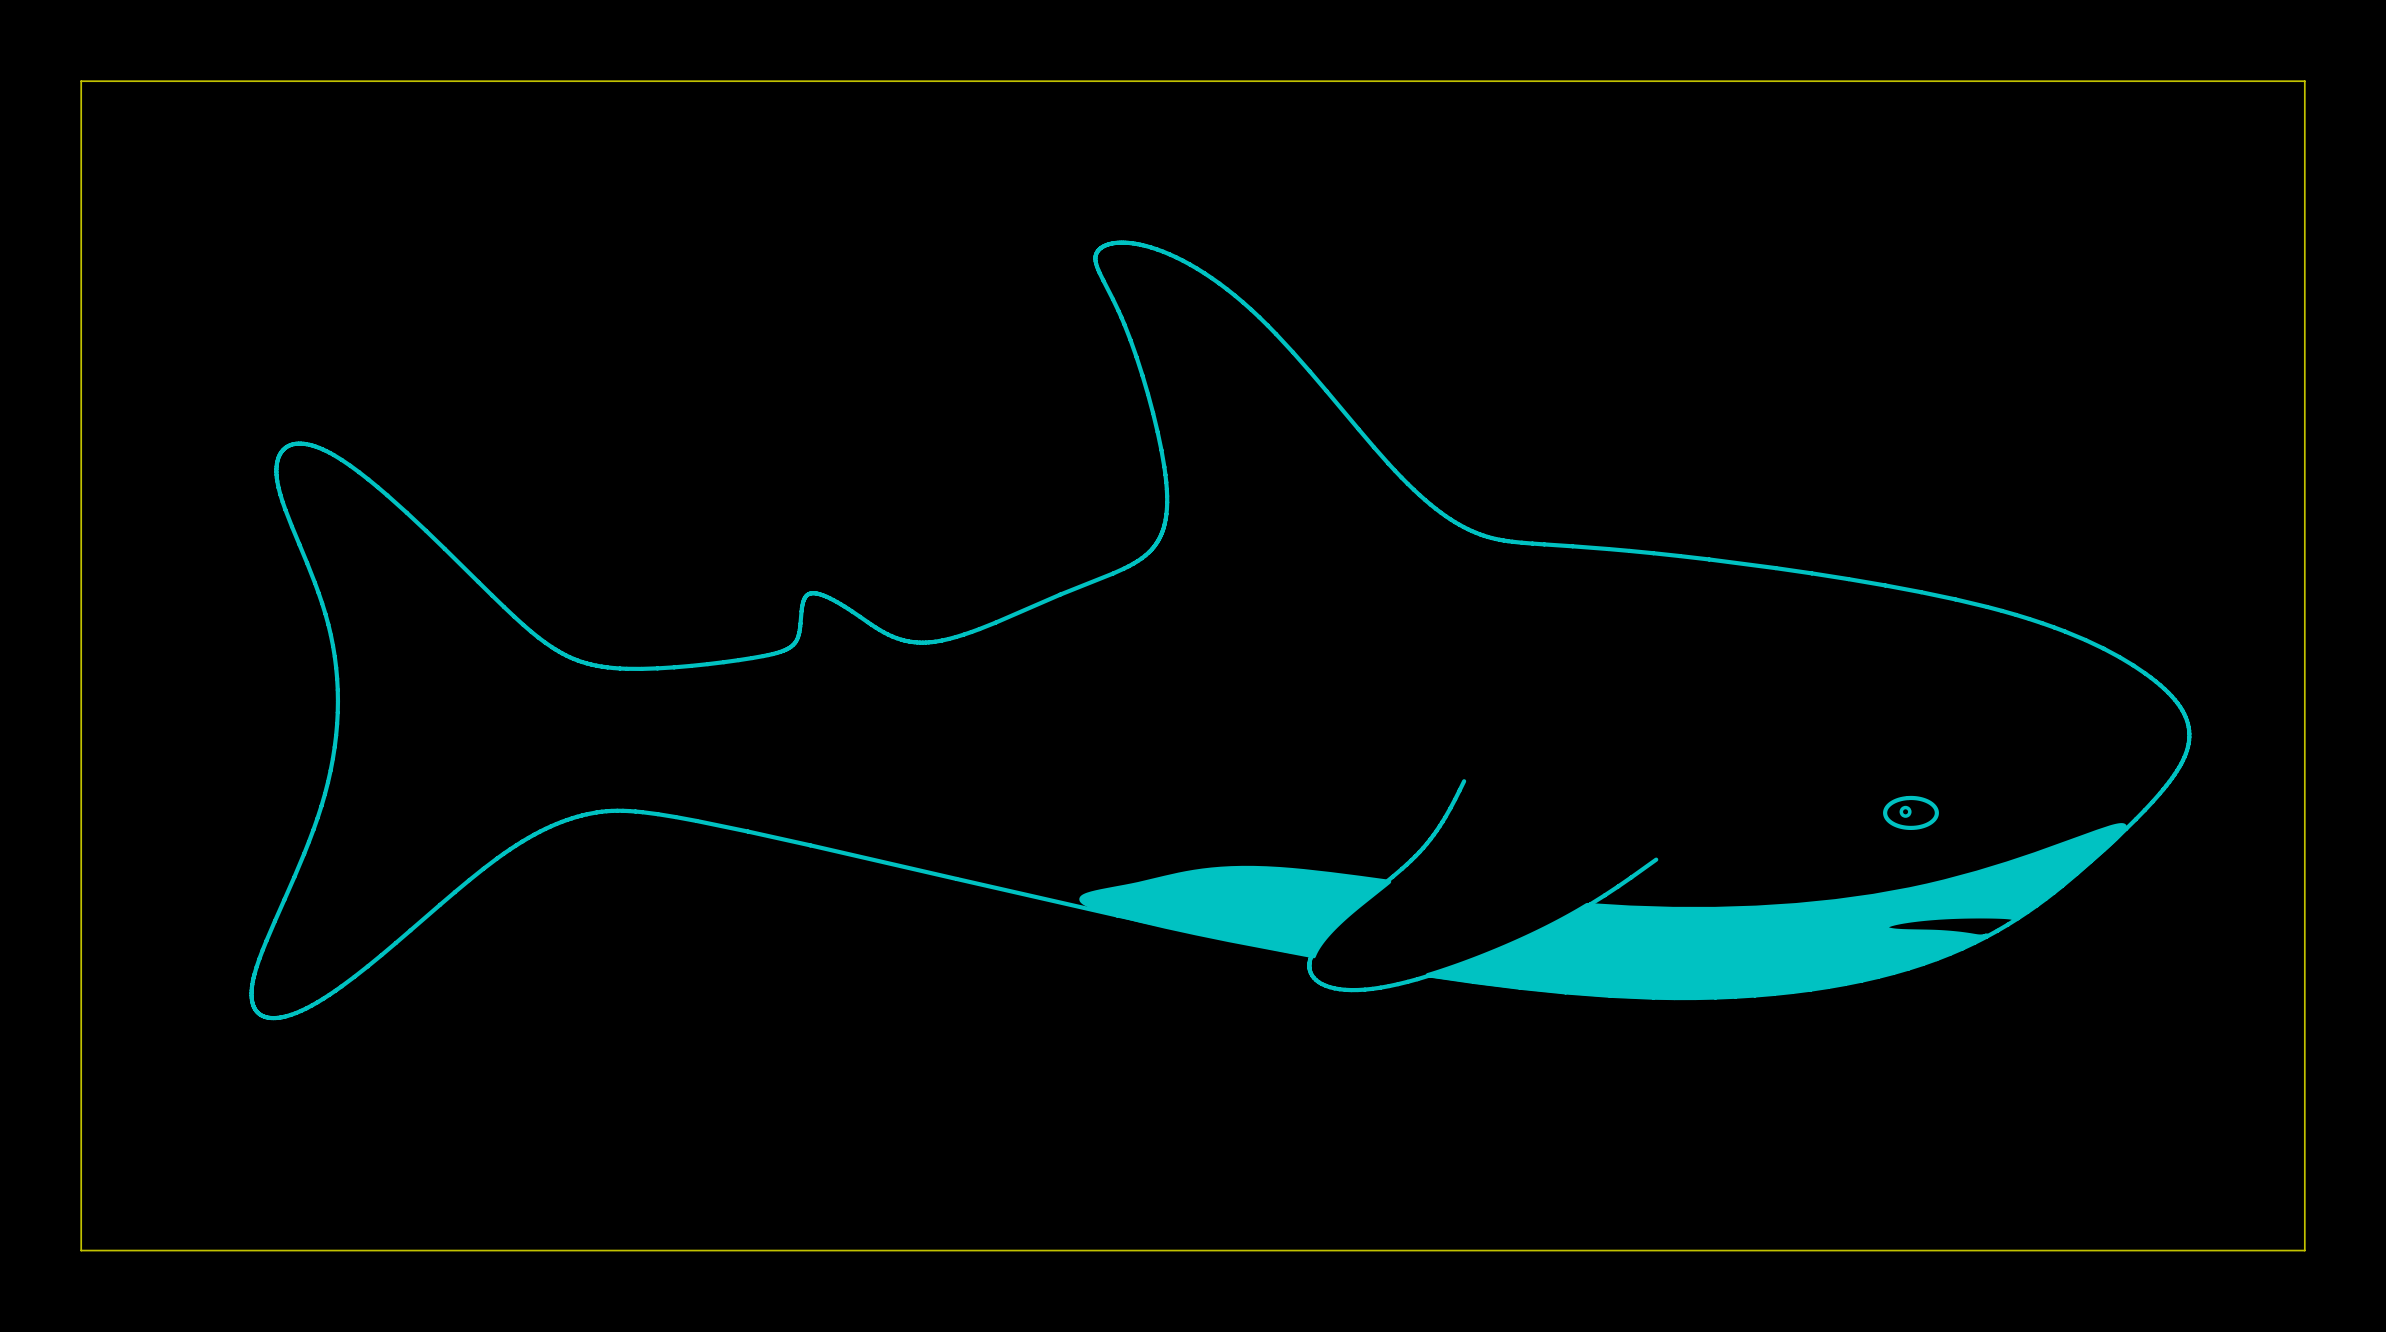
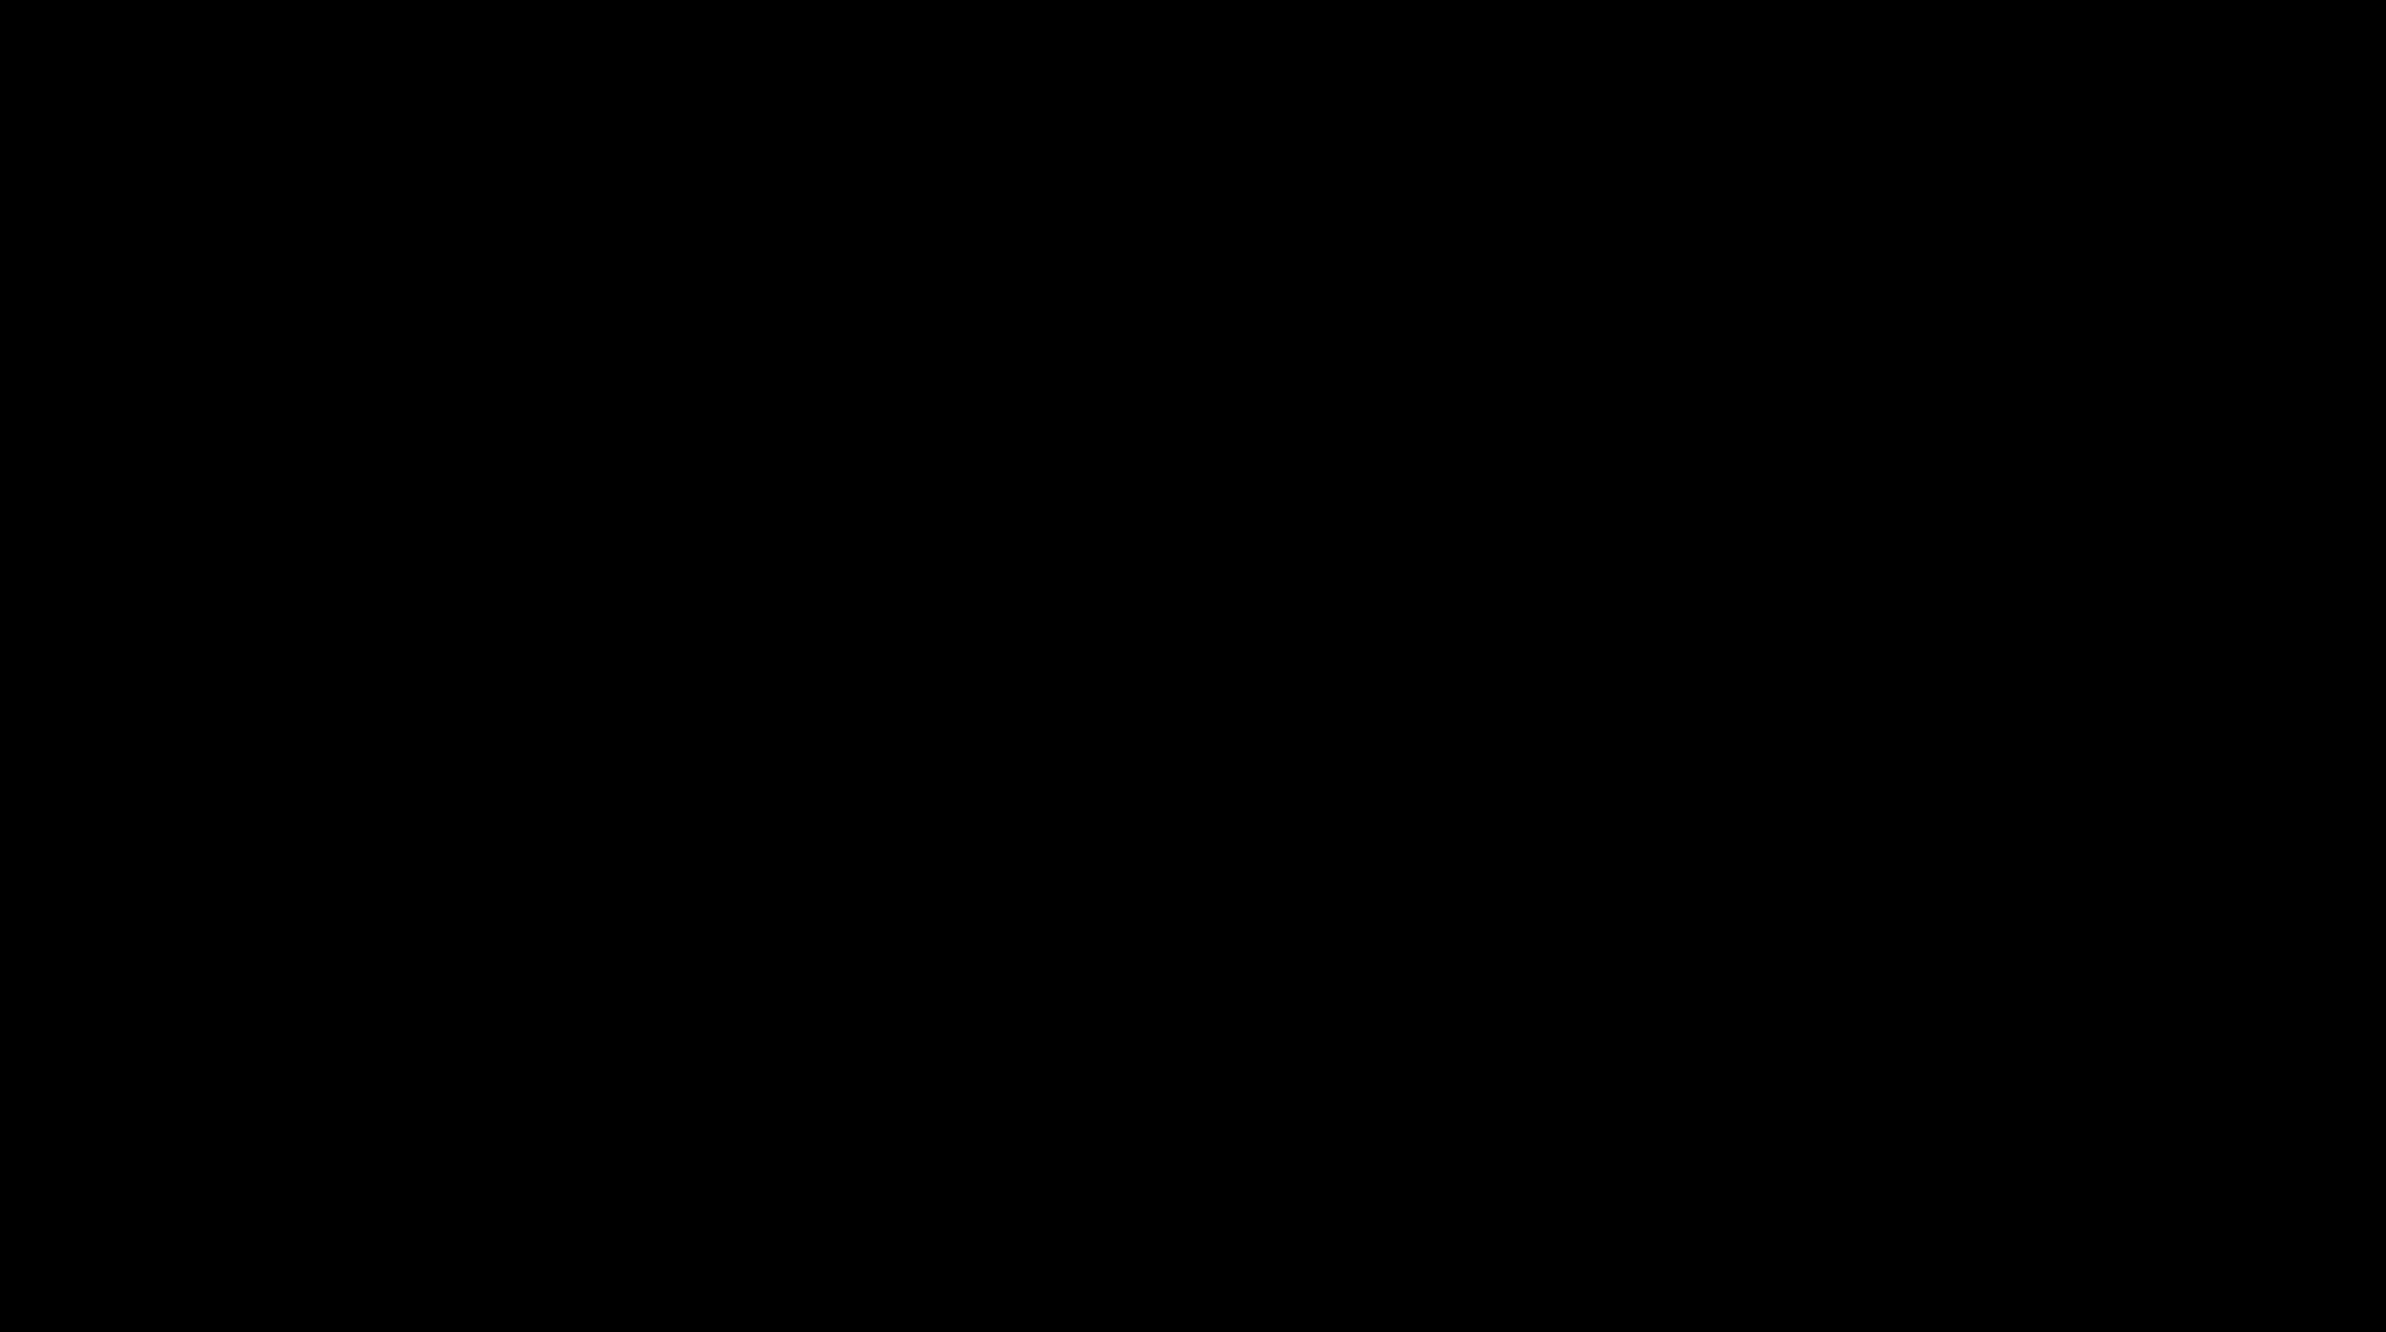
board edge: (81, 81) (2304, 81) (2304, 1250) (81, 1250) (81, 81) -> none
drawing: [249, 240, 2192, 1021] -> none

